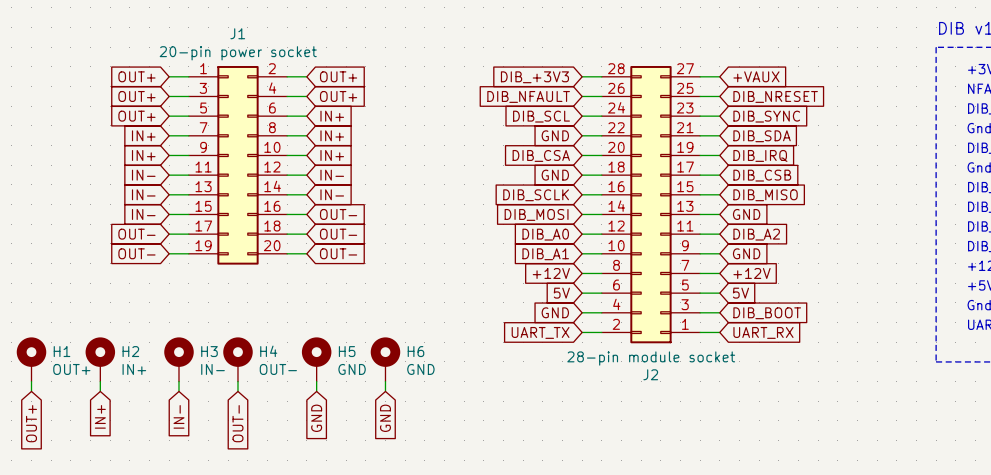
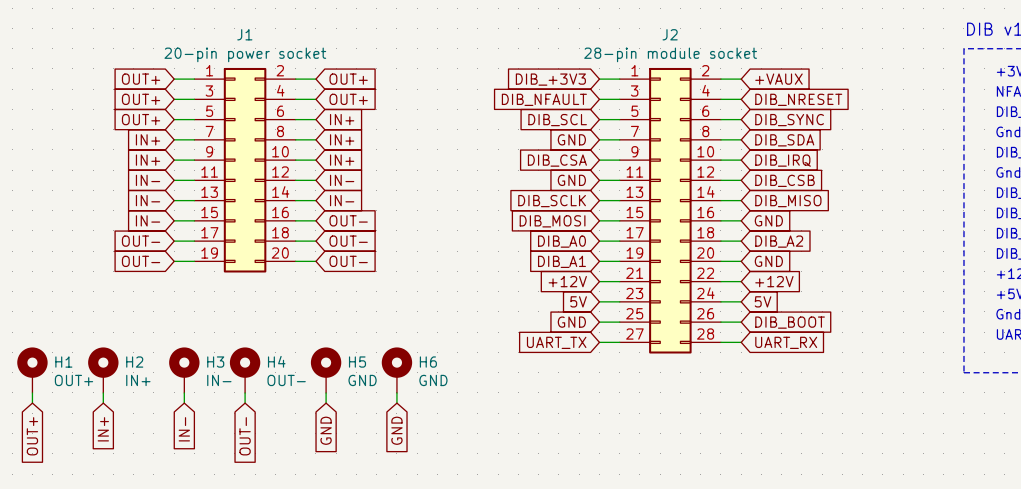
J2 rotation: 0° (650, 204) -> 180° (670, 210)

